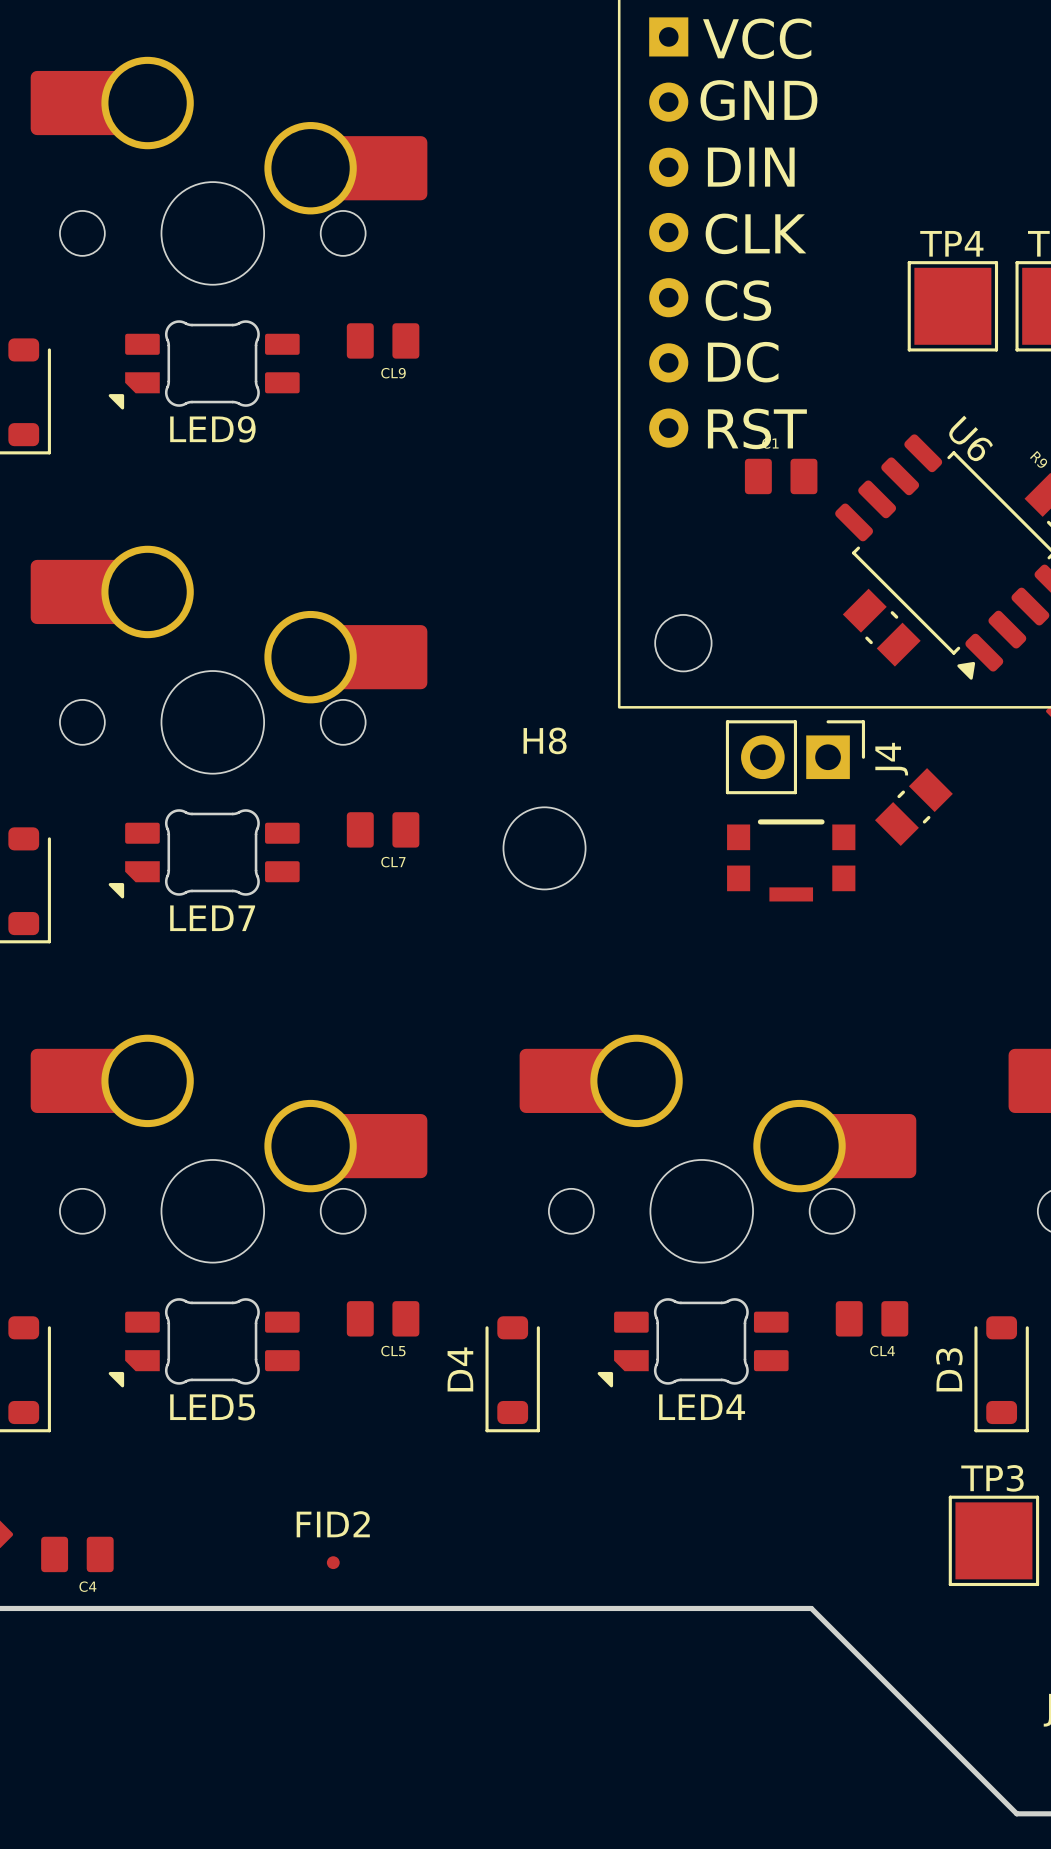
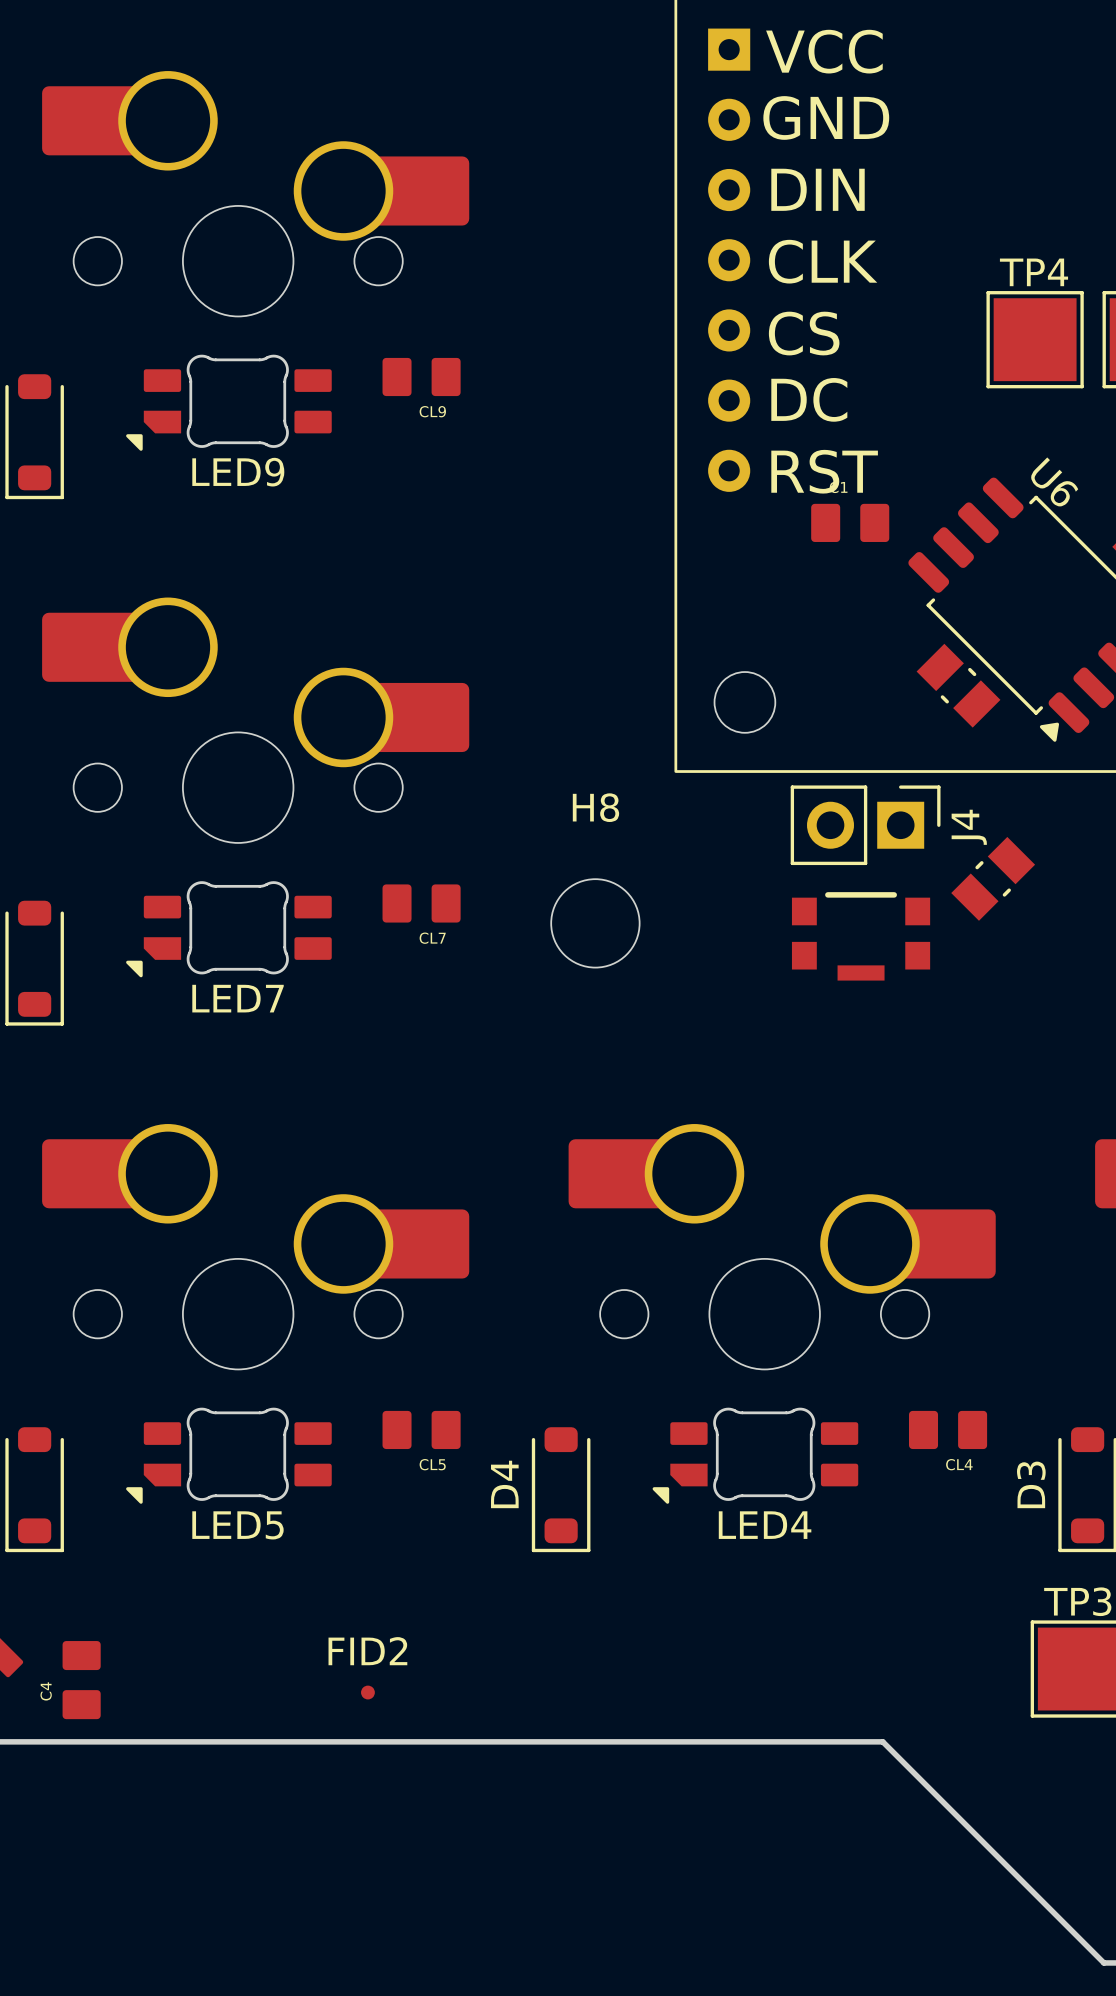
C4 rotation: 0° (77, 1554) -> 90° clockwise (81, 1680)

